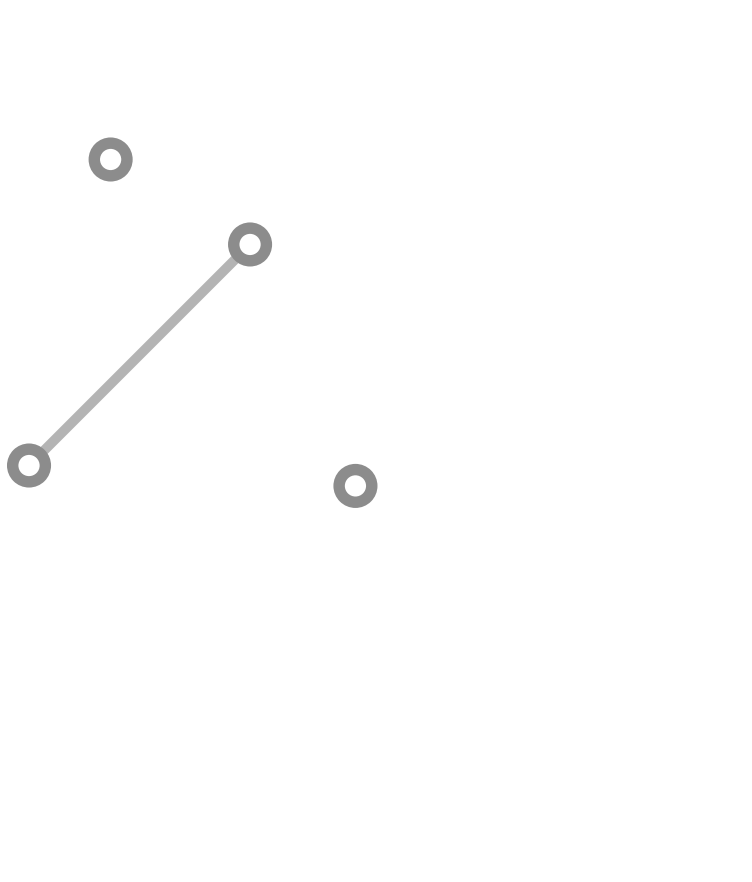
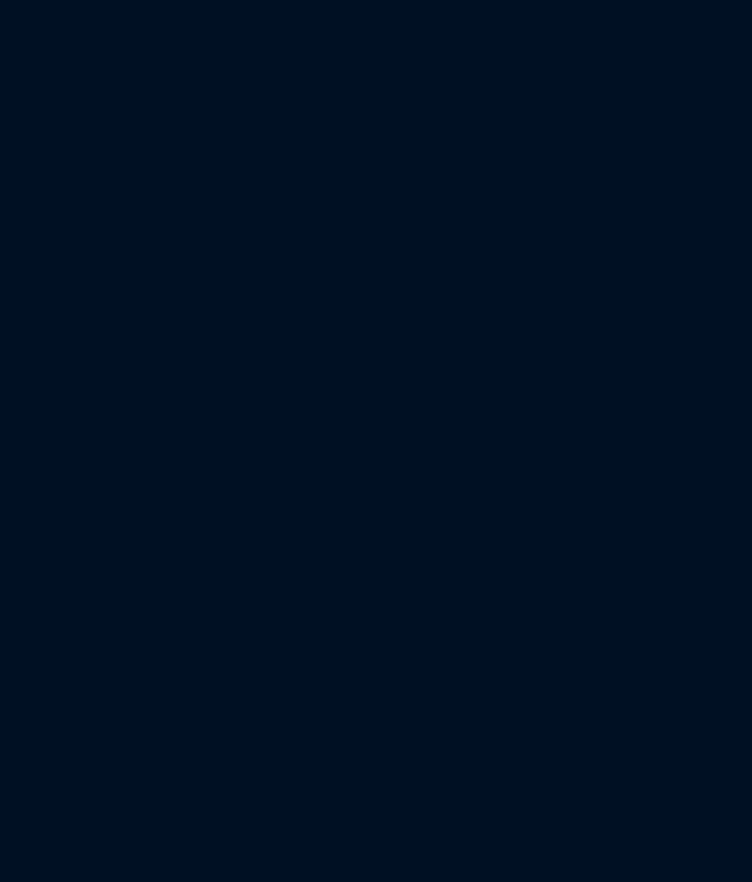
via: (110, 159) -> none
track: (250, 244) (29, 465) -> none
via: (250, 244) -> none
via: (29, 465) -> none
via: (355, 485) -> none

